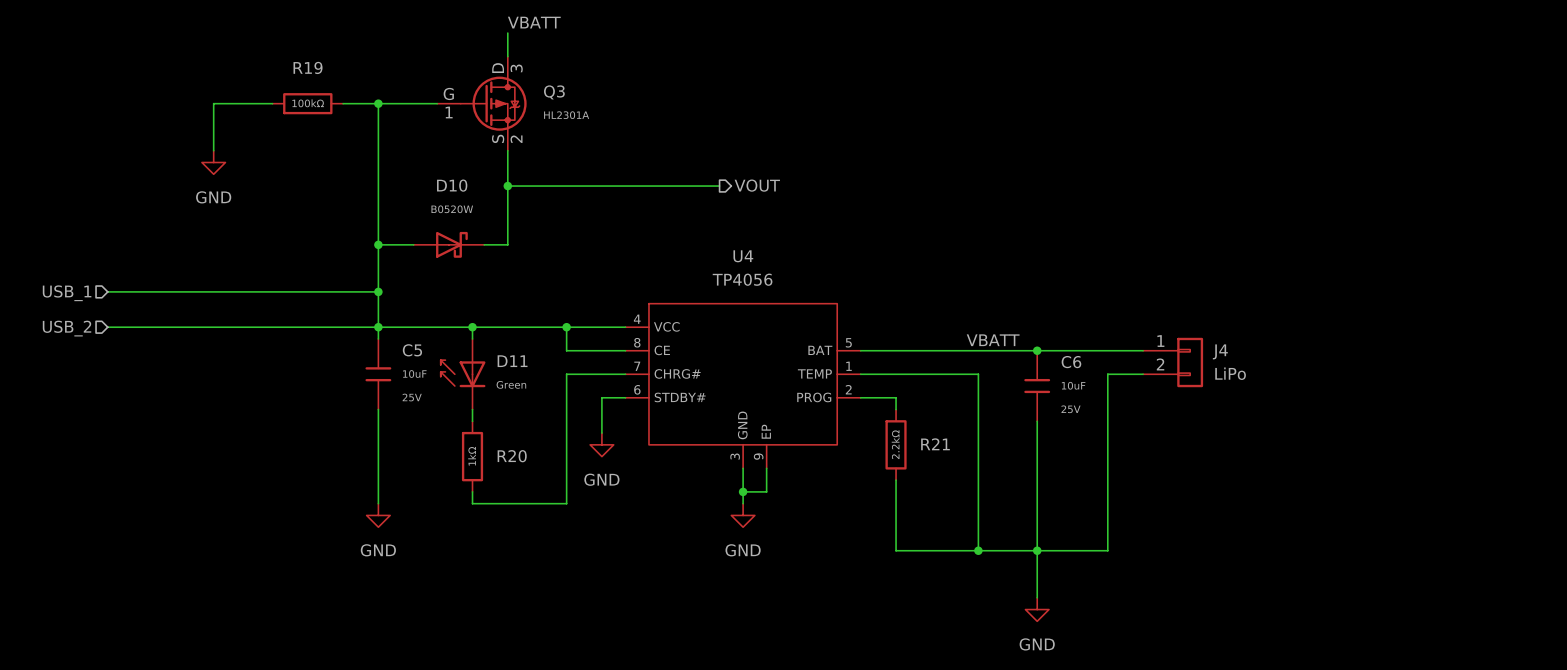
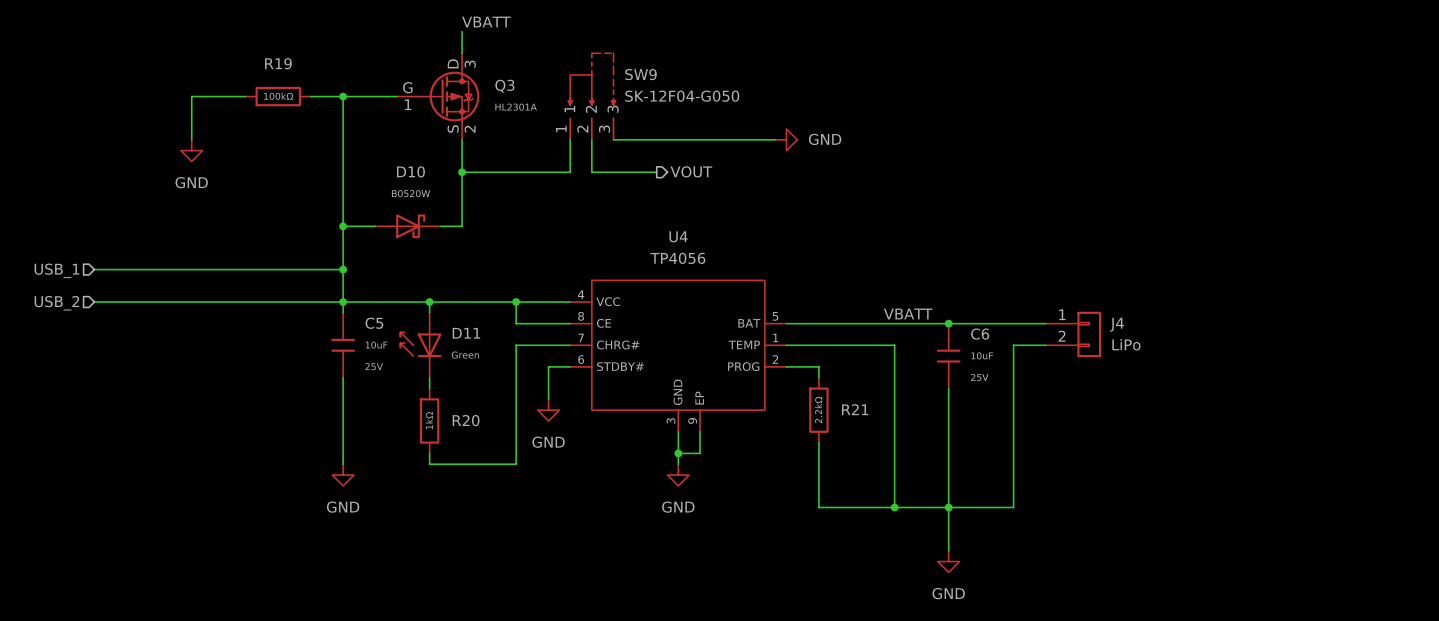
SW9: none -> SK-12F04-G050 (591, 96)
wire: none -> (591, 139) (591, 172)
wire: none -> (613, 139) (775, 139)
power symbol: none -> GND (786, 139)
wire: (625, 186) (648, 186) -> (570, 172) (570, 139)

